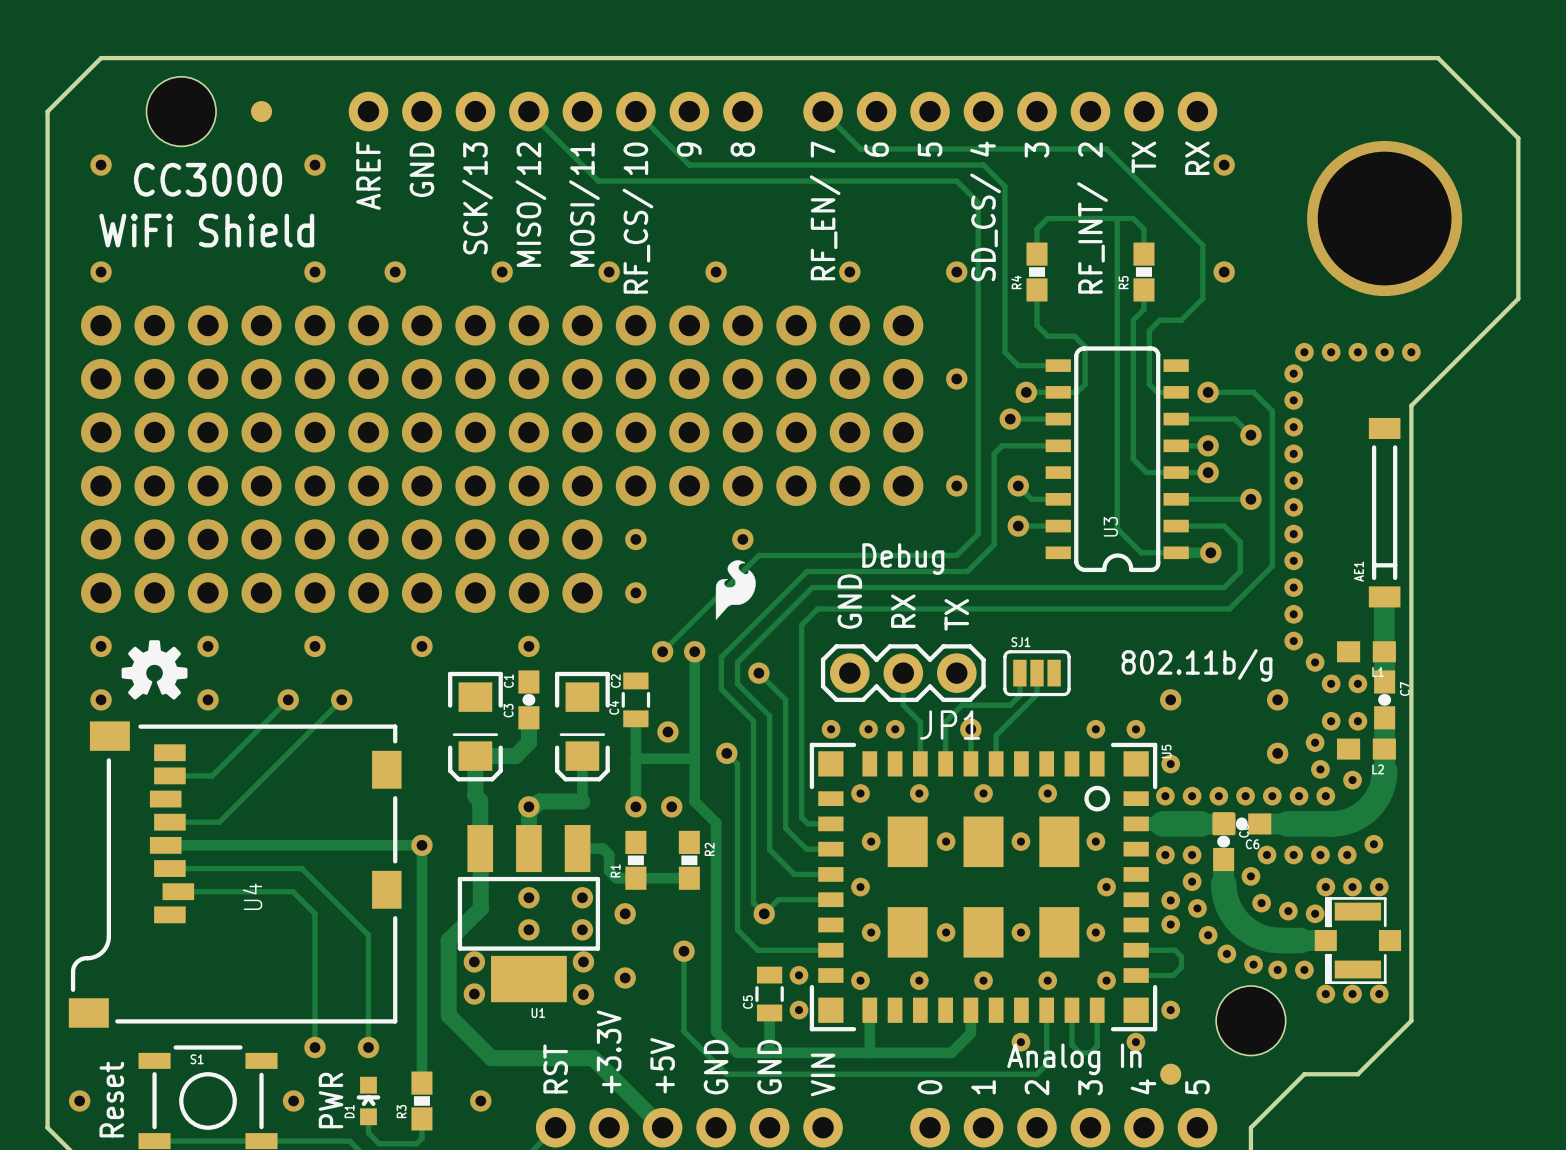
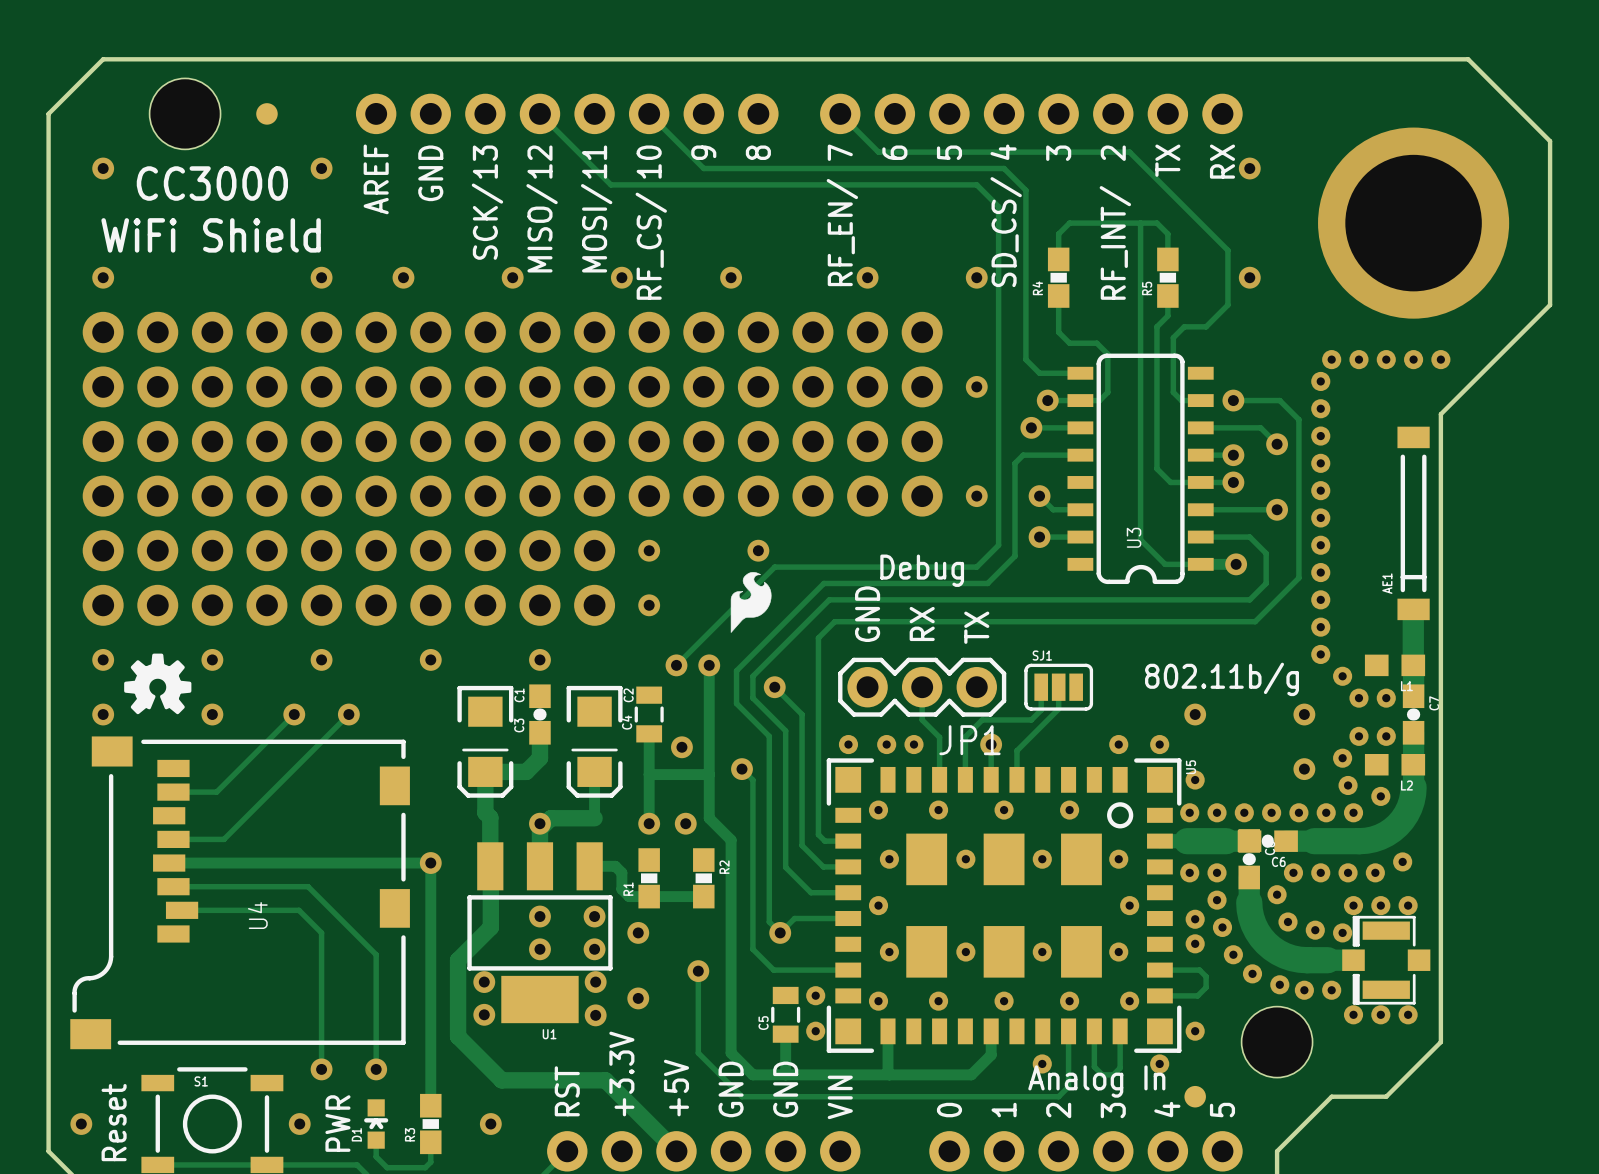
via size: [1307, 140, 1463, 297] -> [1318, 127, 1510, 319]

